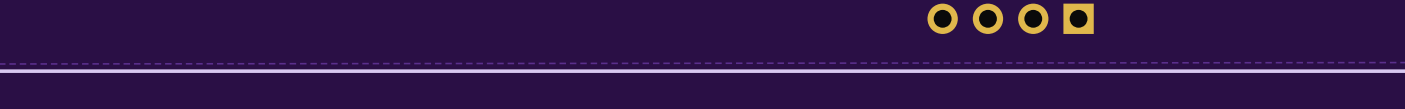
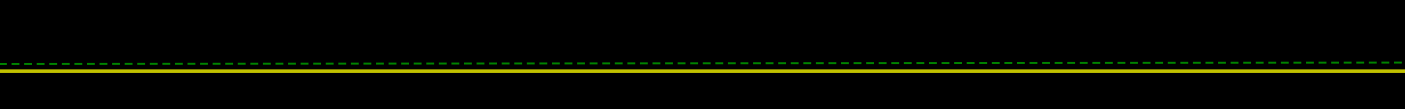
part: (1010, 18) -> none

